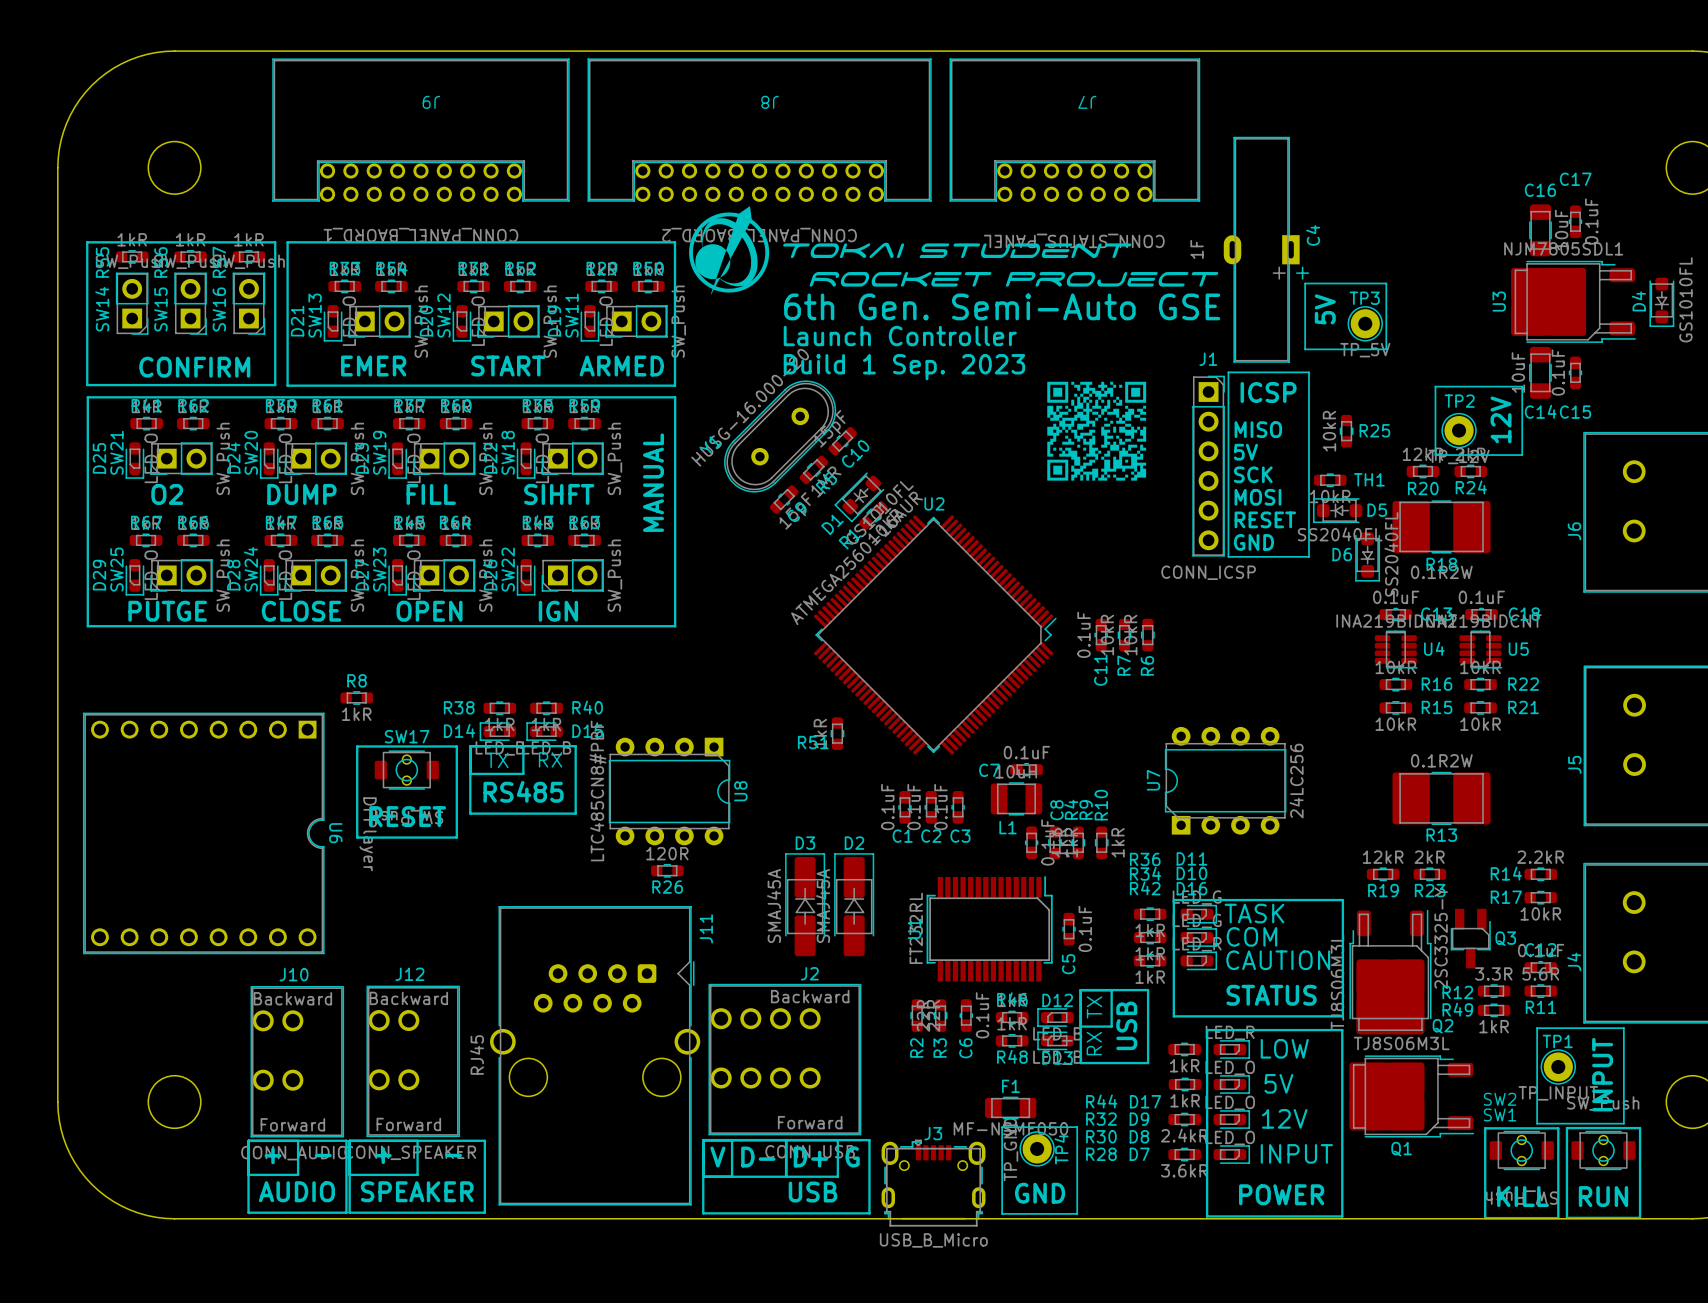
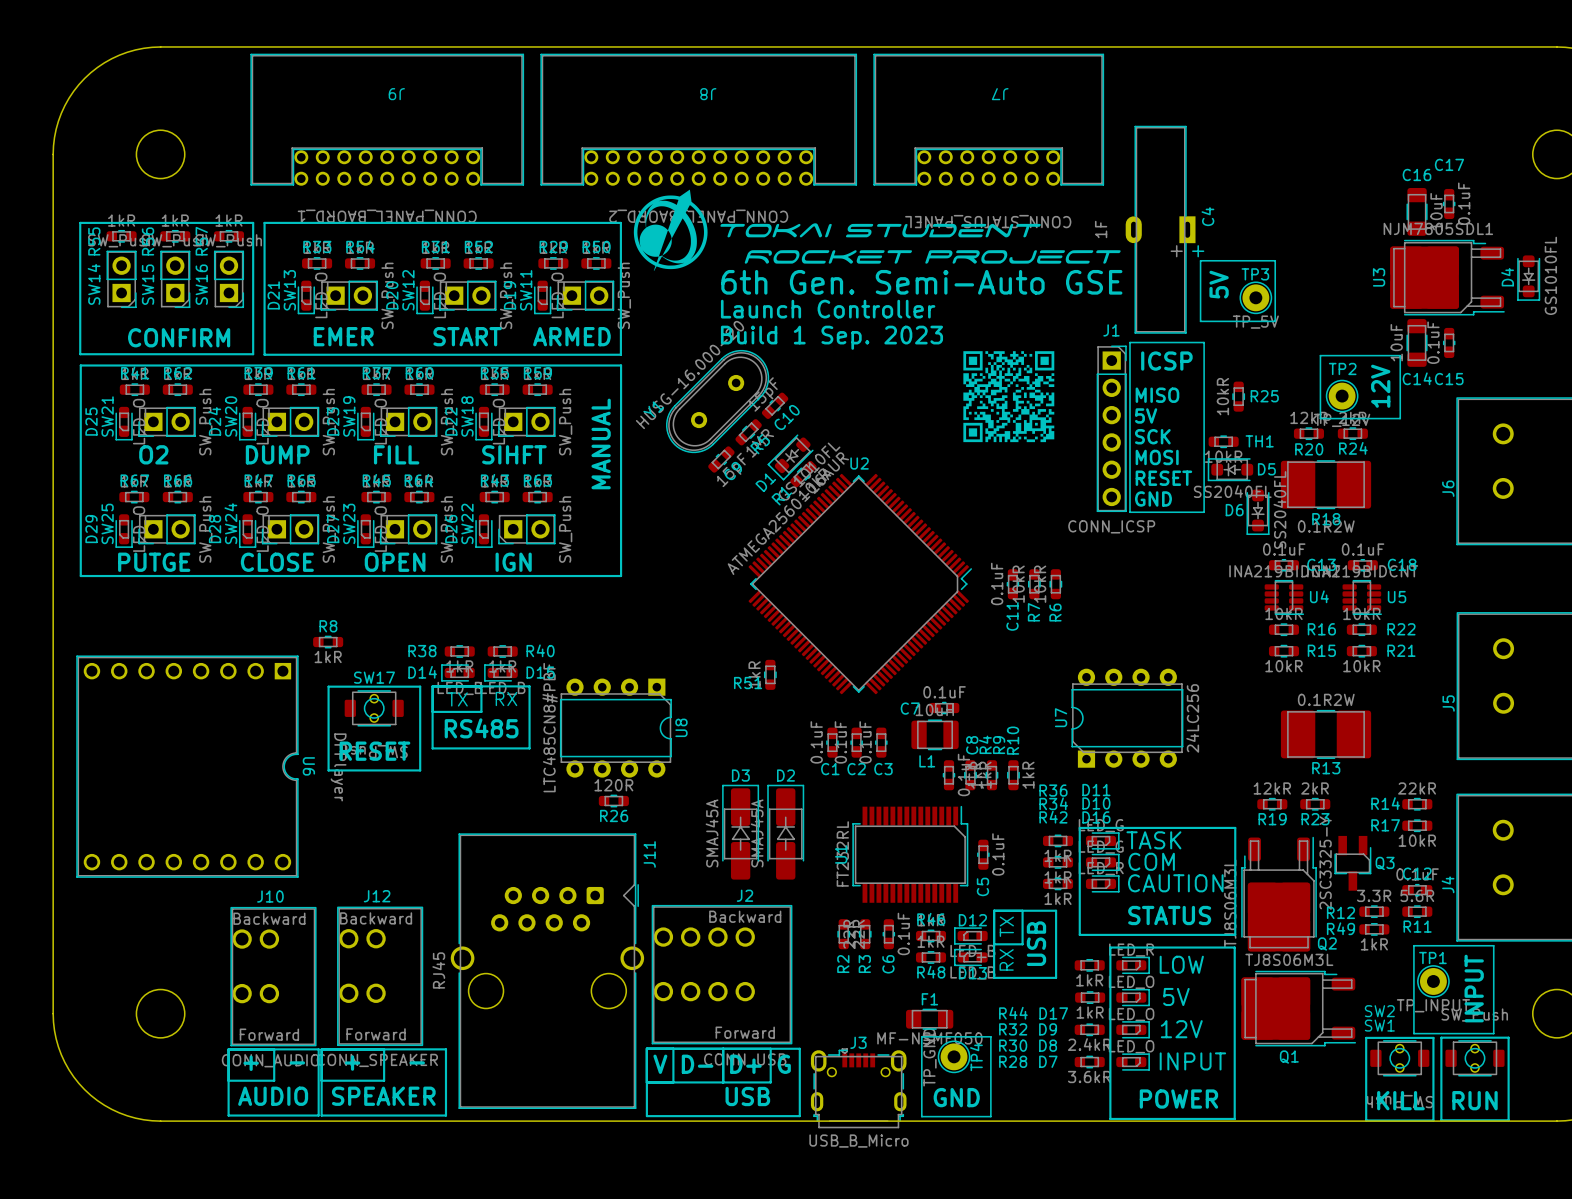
R14 value: 2.2kR (1540, 857) -> 22kR (1417, 788)

